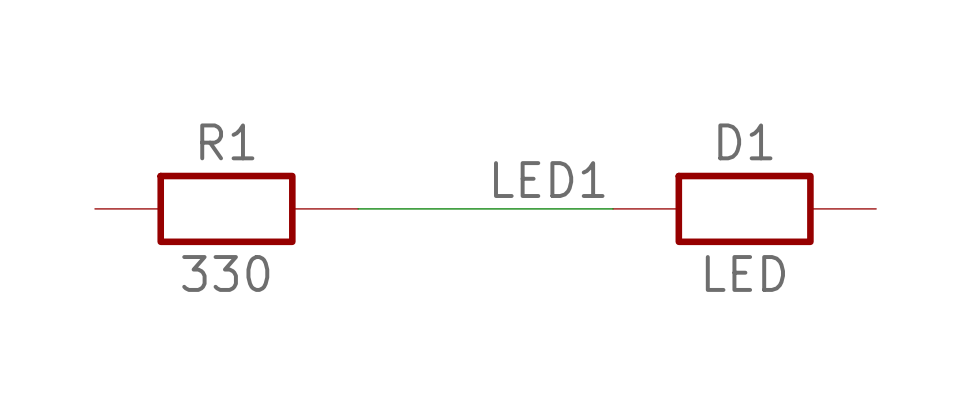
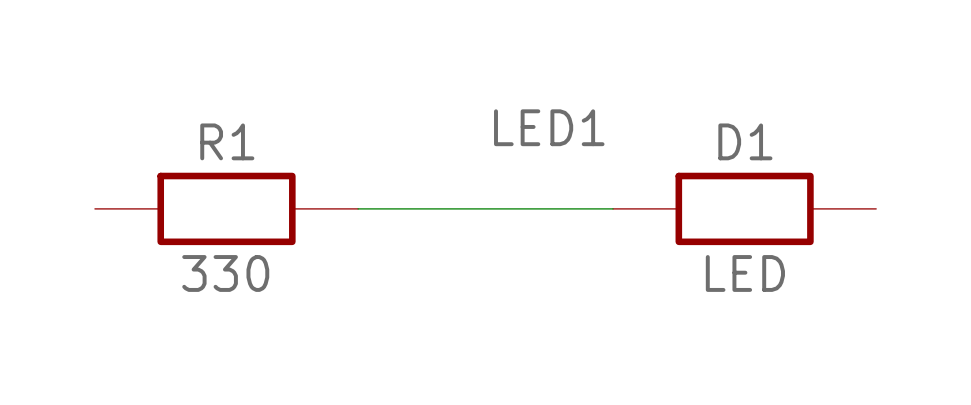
label position: LED1 (549, 179) -> LED1 (549, 127)

